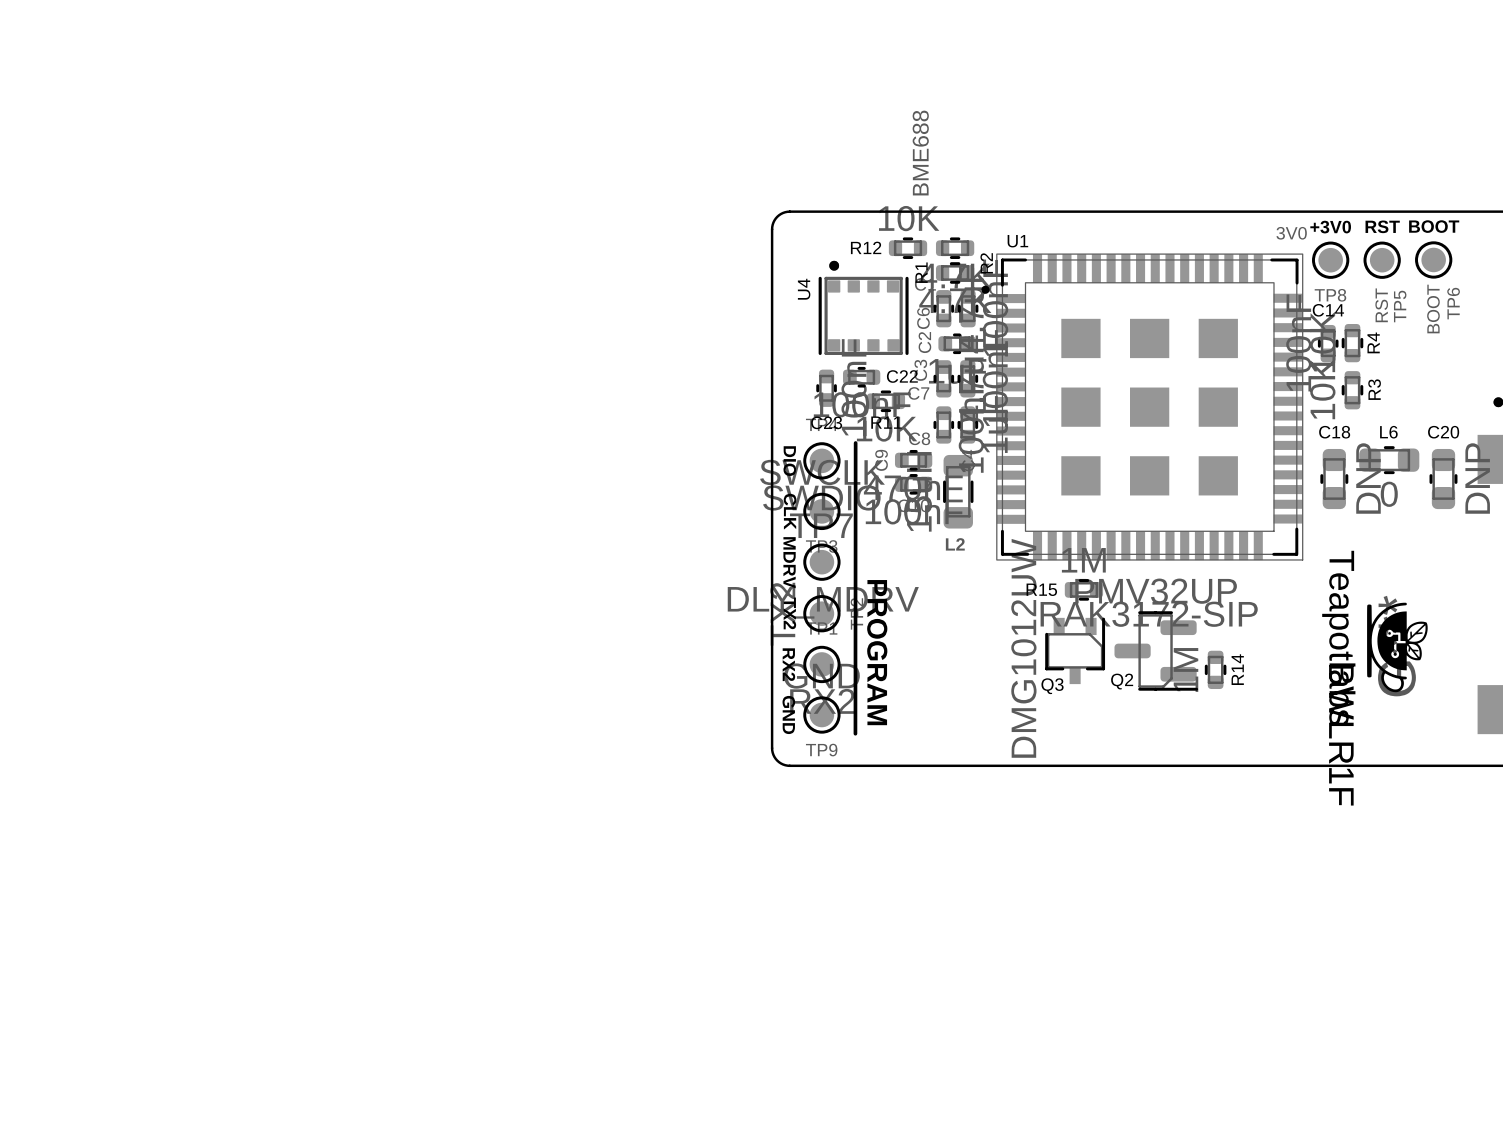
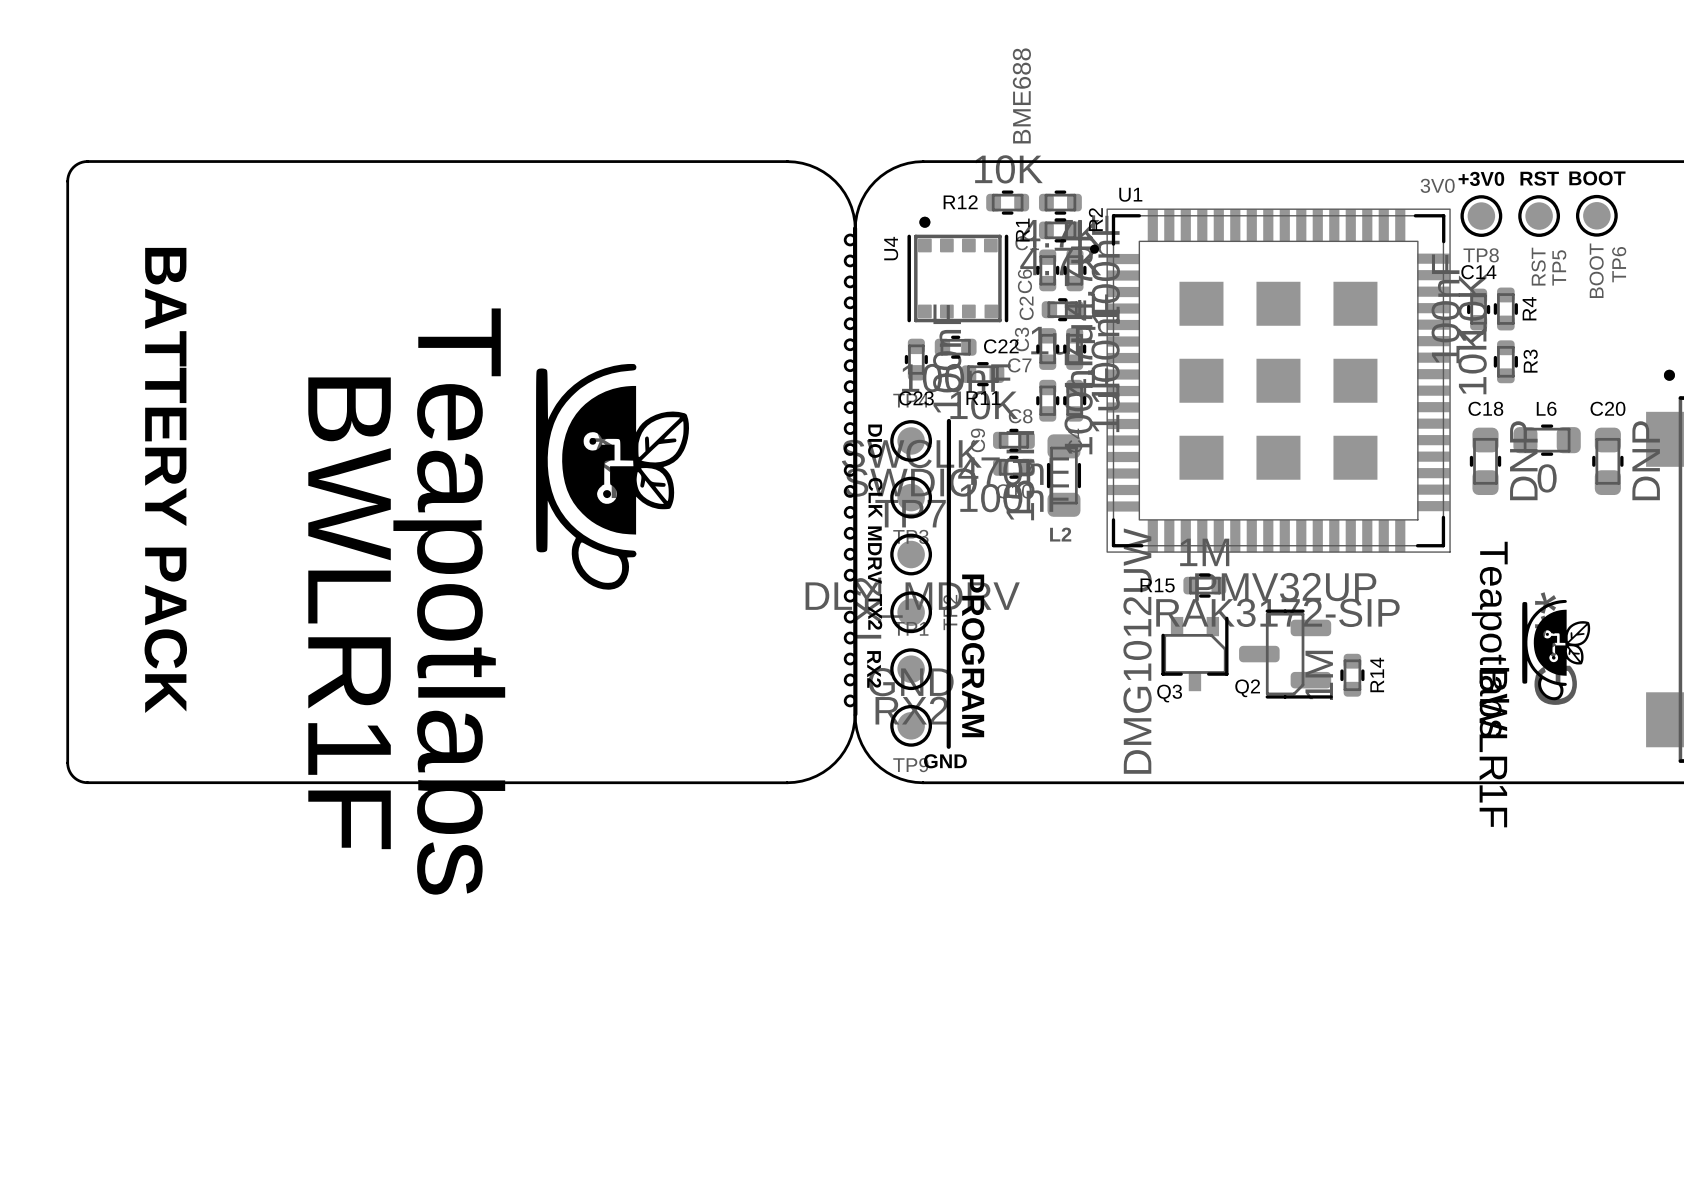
board edge: (832, 211) (785, 212) (775, 218) (772, 229) (772, 750) (775, 758) (785, 765) (832, 765) -> (923, 161) (908, 163) (893, 168) (875, 181) (865, 193) (859, 207) (855, 229) (851, 207) (840, 187) (823, 172) (809, 165) (795, 162) (87, 161) (79, 163) (73, 167) (69, 173) (67, 181) (67, 762) (69, 771) (76, 779) (87, 782) (794, 782) (809, 778) (823, 772) (840, 757) (851, 737) (854, 714) (856, 729) (861, 744) (875, 762) (893, 776) (907, 781) (923, 782)
line: none -> (855, 228) (855, 714)
round board edge: none -> [843, 233, 857, 247]
round board edge: none -> [843, 254, 857, 268]
round board edge: none -> [843, 275, 857, 289]
round board edge: none -> [843, 296, 857, 310]
round board edge: none -> [843, 317, 857, 331]
round board edge: none -> [843, 338, 857, 352]
round board edge: none -> [843, 359, 857, 373]
round board edge: none -> [843, 380, 857, 394]
round board edge: none -> [843, 401, 857, 414]
round board edge: none -> [843, 422, 857, 435]
round board edge: none -> [843, 443, 857, 456]
round board edge: none -> [843, 464, 857, 477]
part: none -> (612, 476)
text: none -> BATTERY PACK (165, 480)
round board edge: none -> [843, 485, 857, 498]
round board edge: none -> [843, 505, 857, 519]
round board edge: none -> [843, 526, 857, 540]
round board edge: none -> [843, 547, 857, 561]
round board edge: none -> [843, 568, 857, 582]
round board edge: none -> [843, 589, 857, 603]
text: none -> Teapotlabs (449, 601)
round board edge: none -> [843, 610, 857, 624]
text: none -> BWLR1F (349, 613)
round board edge: none -> [843, 631, 857, 645]
round board edge: none -> [843, 652, 857, 666]
round board edge: none -> [843, 673, 857, 687]
round board edge: none -> [843, 694, 857, 708]
text rotation: 0° (788, 714) -> 90° counterclockwise (945, 761)
text position: GND (788, 714) -> GND (945, 761)

